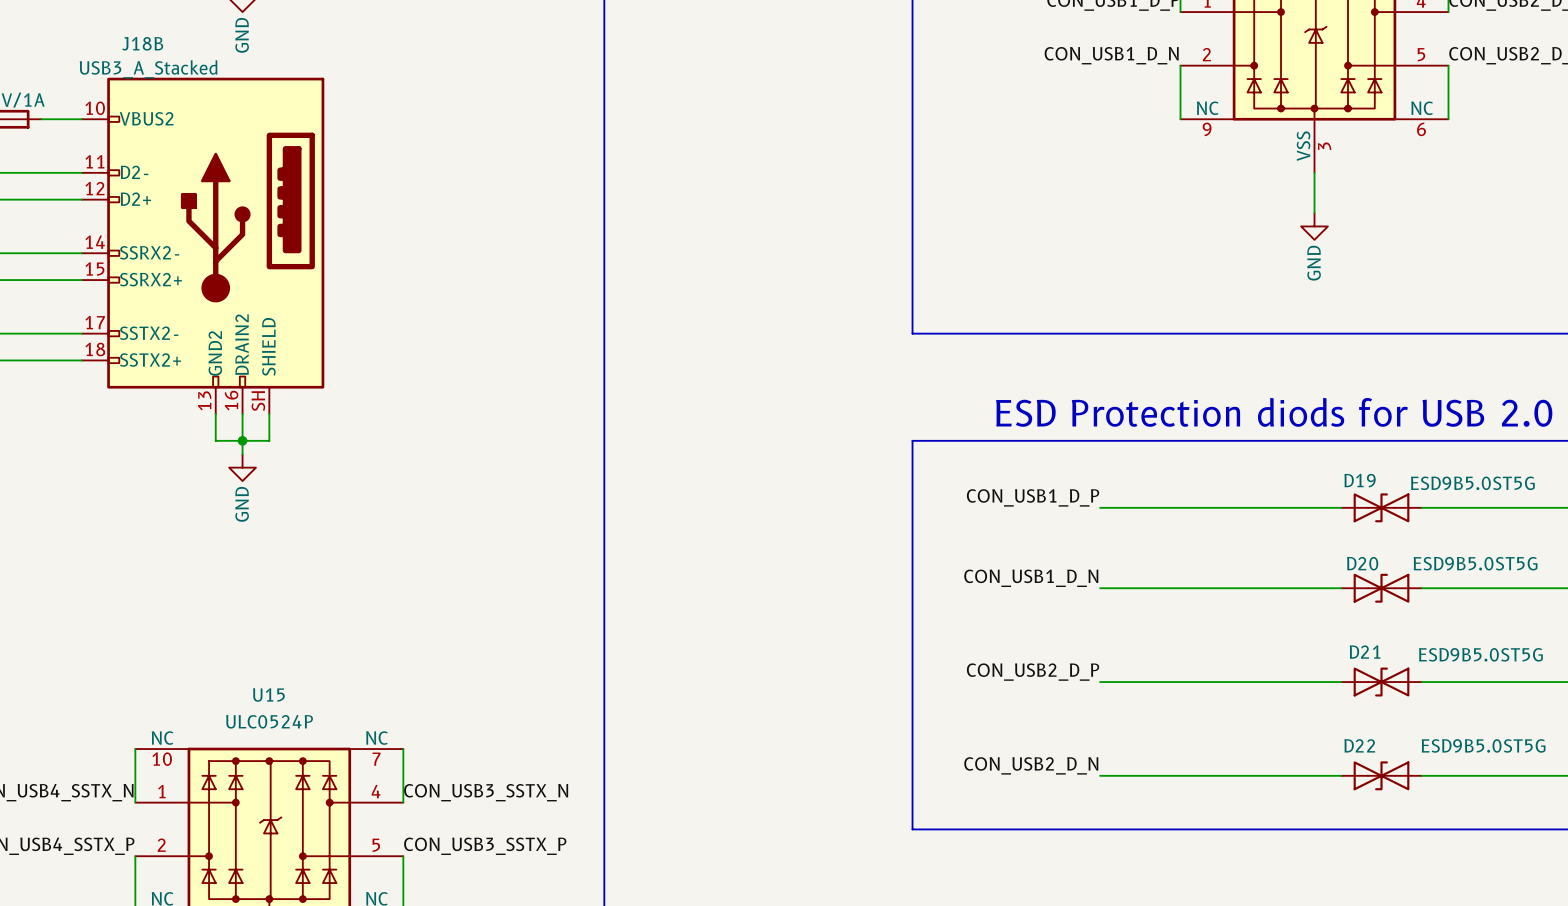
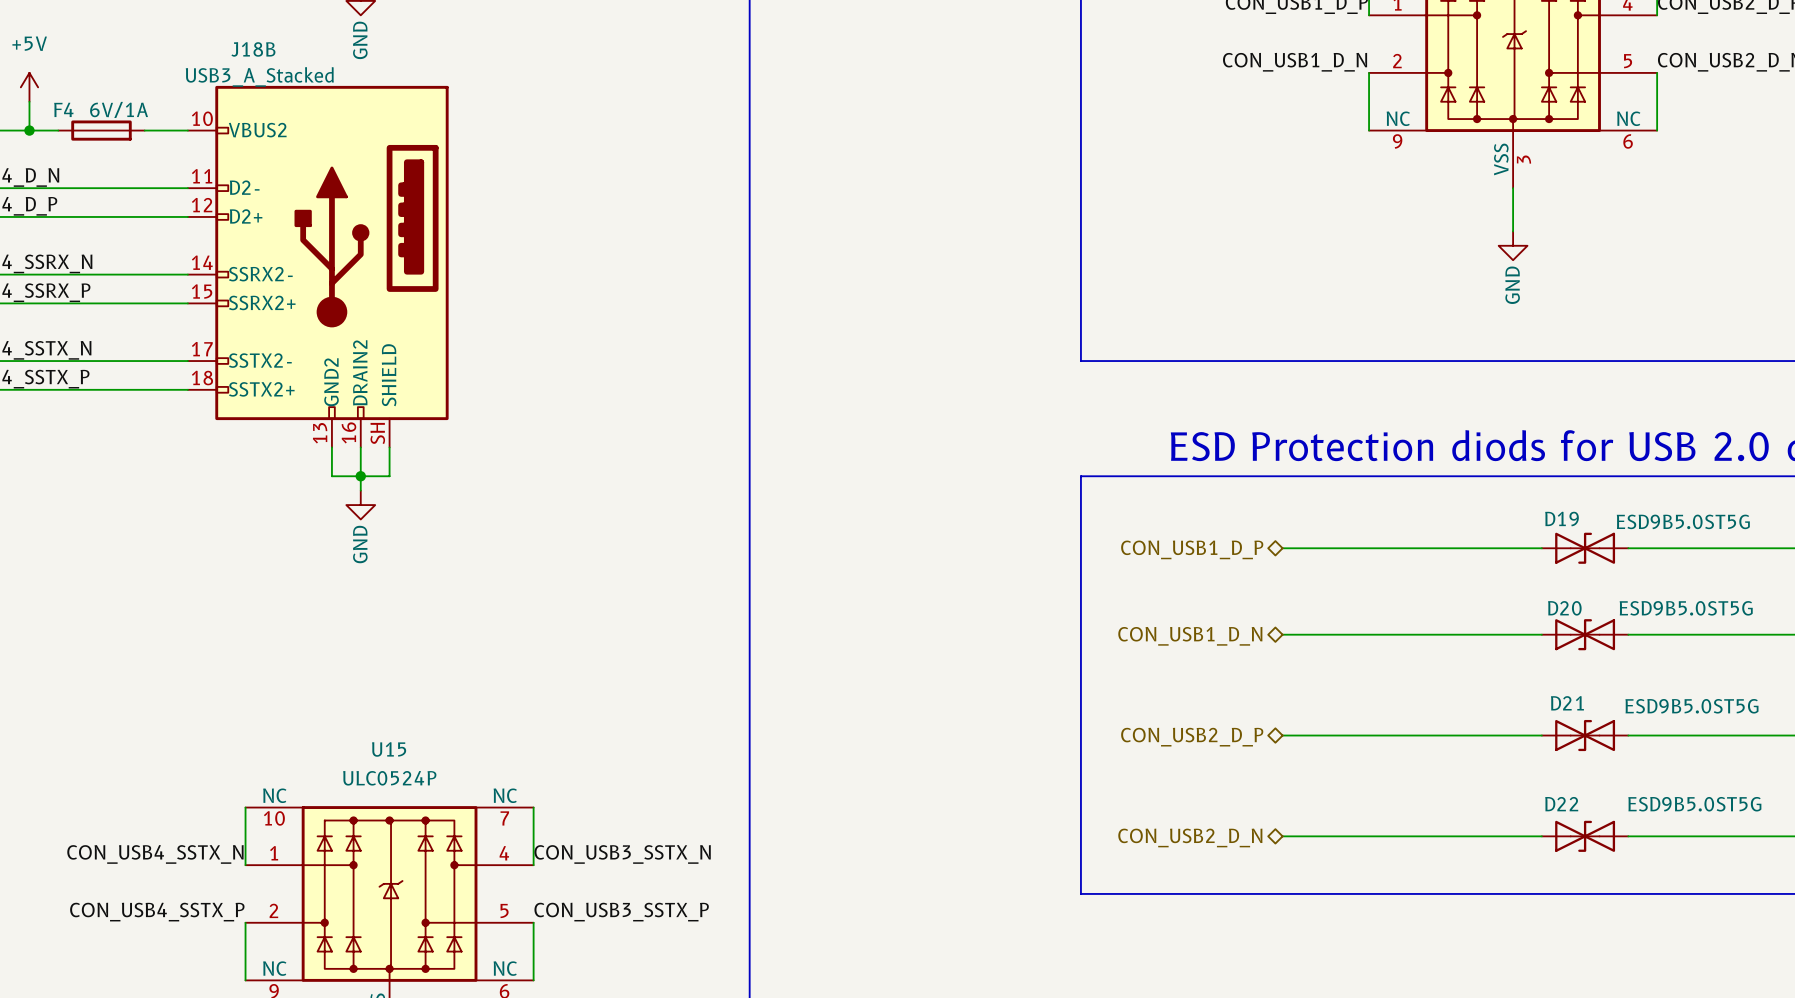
label: CON_USB1_D_P (1033, 497) -> none
hierarchical label: none -> CON_USB1_D_P (1192, 549)
label: CON_USB1_D_N (1031, 578) -> none
hierarchical label: none -> CON_USB1_D_N (1190, 636)
label: CON_USB2_D_P (1033, 672) -> none
hierarchical label: none -> CON_USB2_D_P (1192, 737)
label: CON_USB2_D_N (1031, 765) -> none
hierarchical label: none -> CON_USB2_D_N (1190, 837)

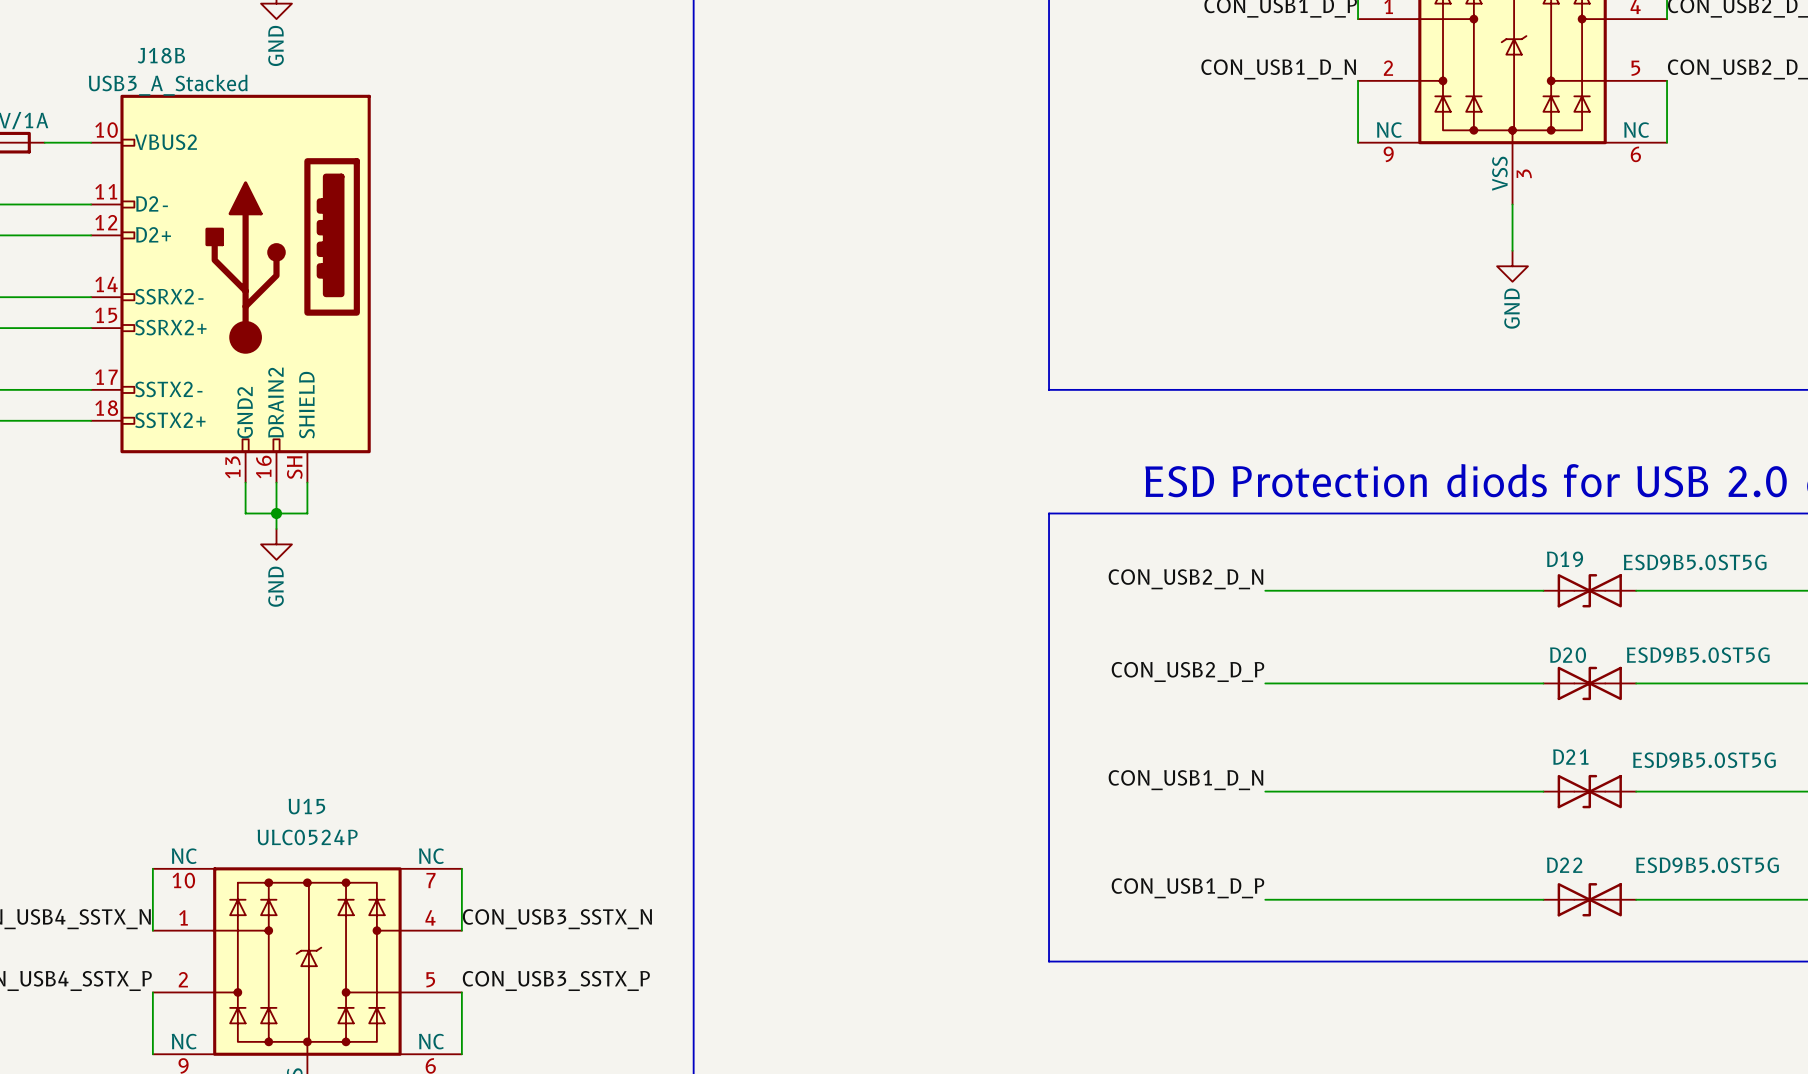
label: none -> CON_USB2_D_N (1185, 579)
hierarchical label: CON_USB1_D_P (1192, 549) -> none
label: none -> CON_USB2_D_P (1187, 671)
hierarchical label: CON_USB1_D_N (1190, 636) -> none
label: none -> CON_USB1_D_N (1185, 780)
hierarchical label: CON_USB2_D_P (1192, 737) -> none
label: none -> CON_USB1_D_P (1187, 888)
hierarchical label: CON_USB2_D_N (1190, 837) -> none

